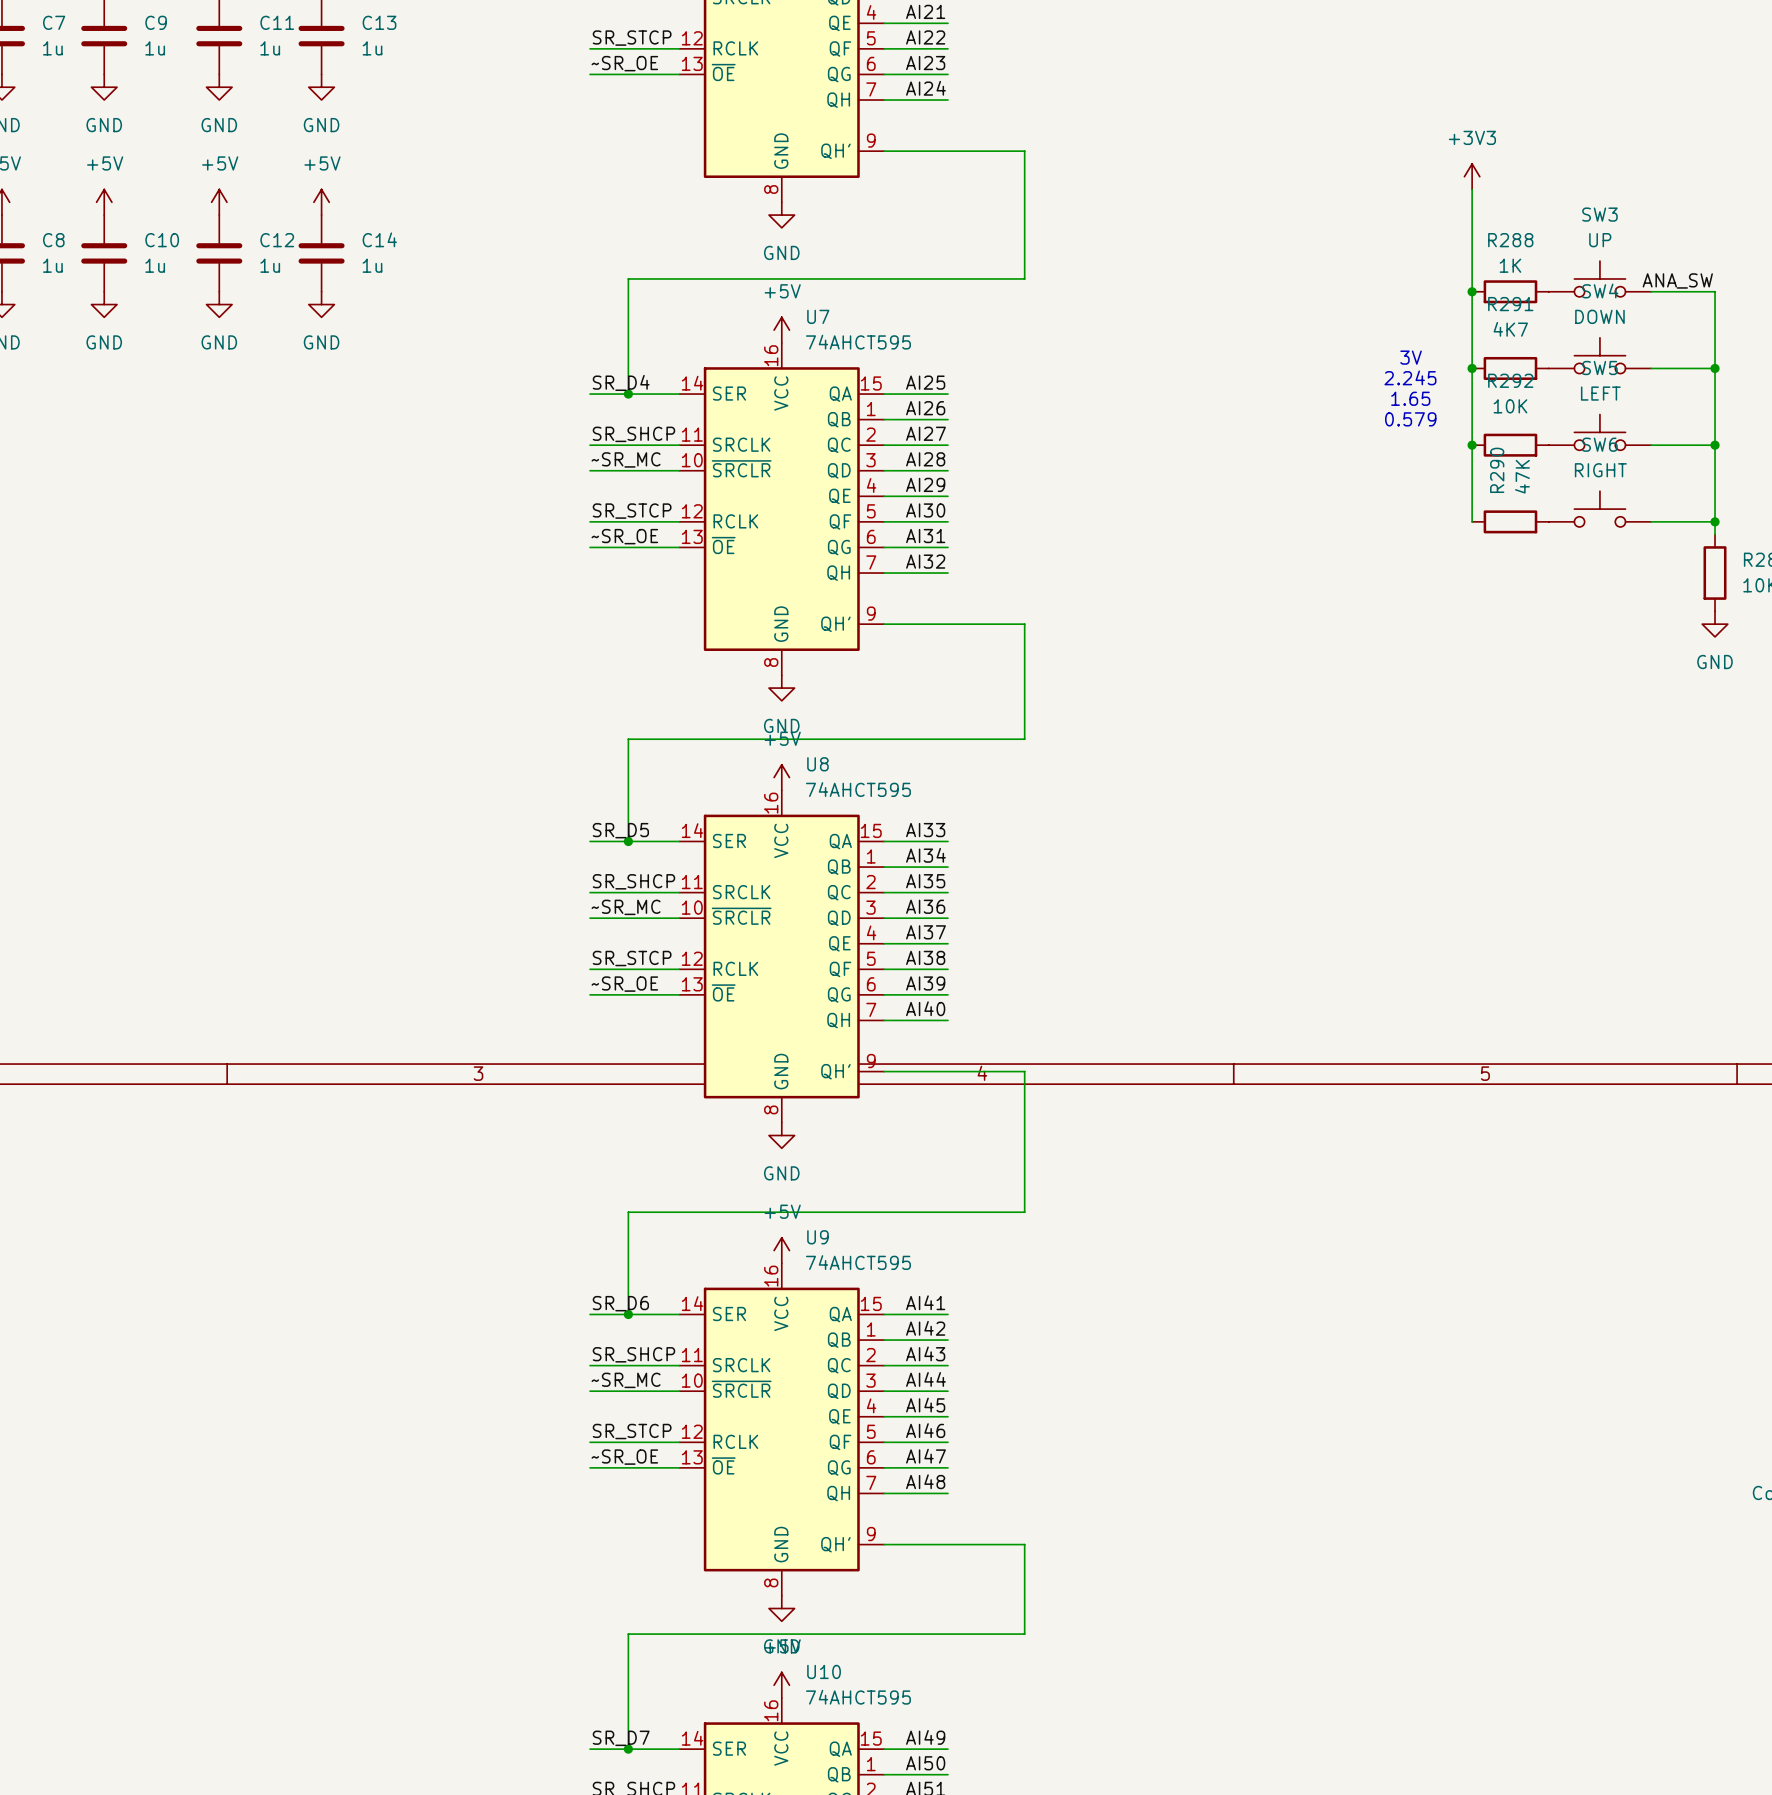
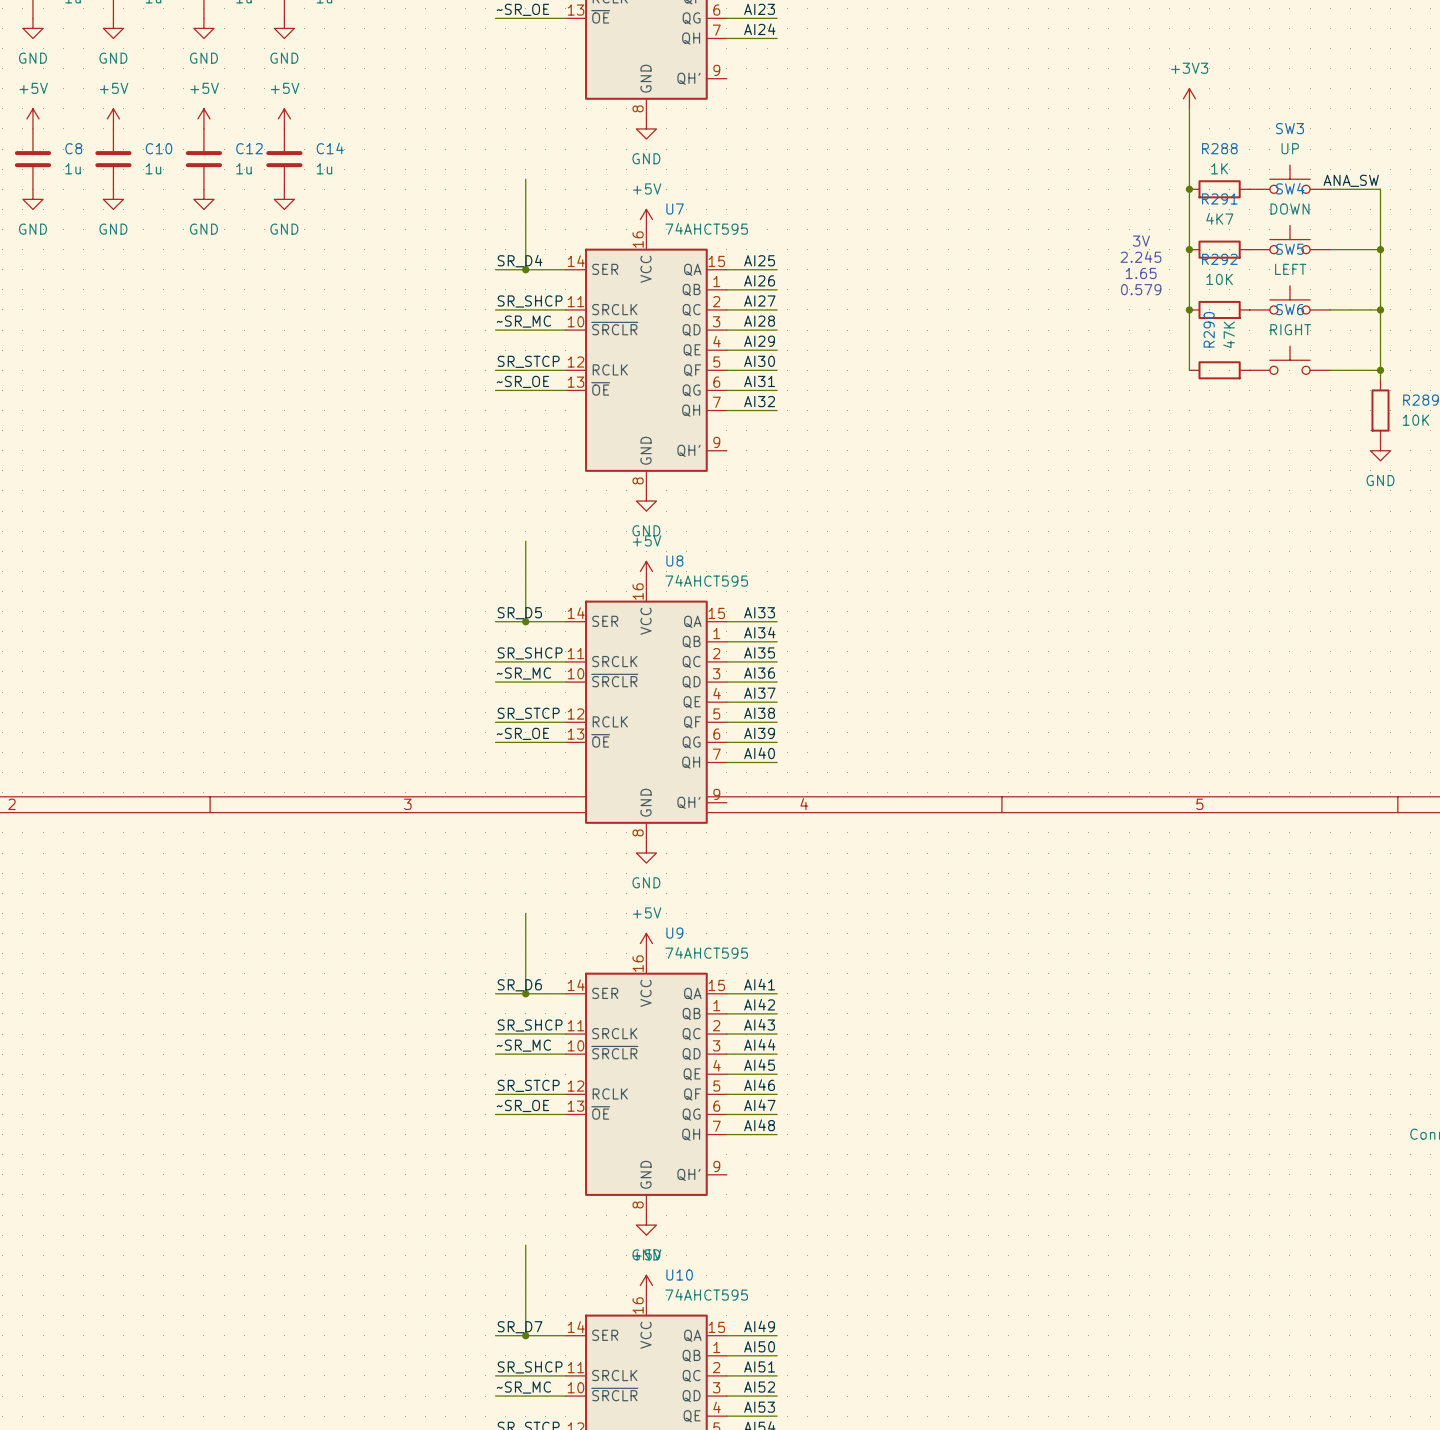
wire: (884, 151) (1024, 151) (1024, 278) (628, 278) -> none
wire: (884, 624) (1024, 624) (1024, 739) (628, 739) -> none
wire: (884, 1071) (1024, 1071) (1024, 1212) (628, 1212) -> none
wire: (884, 1544) (1024, 1544) (1024, 1634) (628, 1634) -> none

